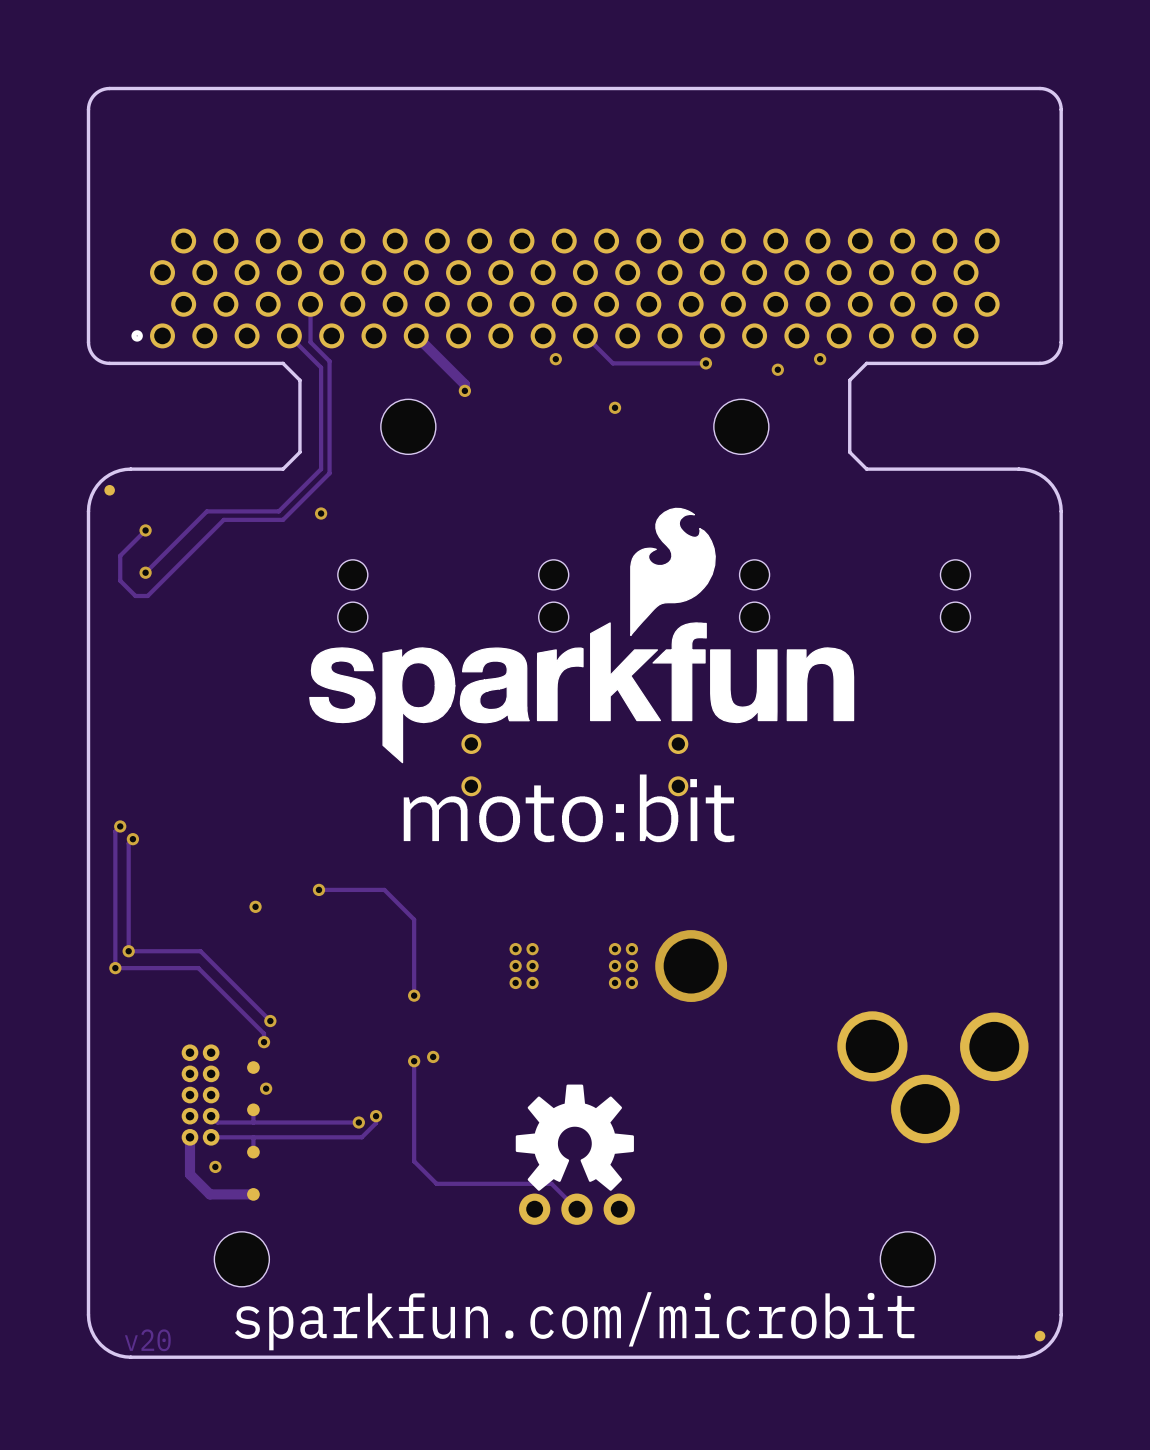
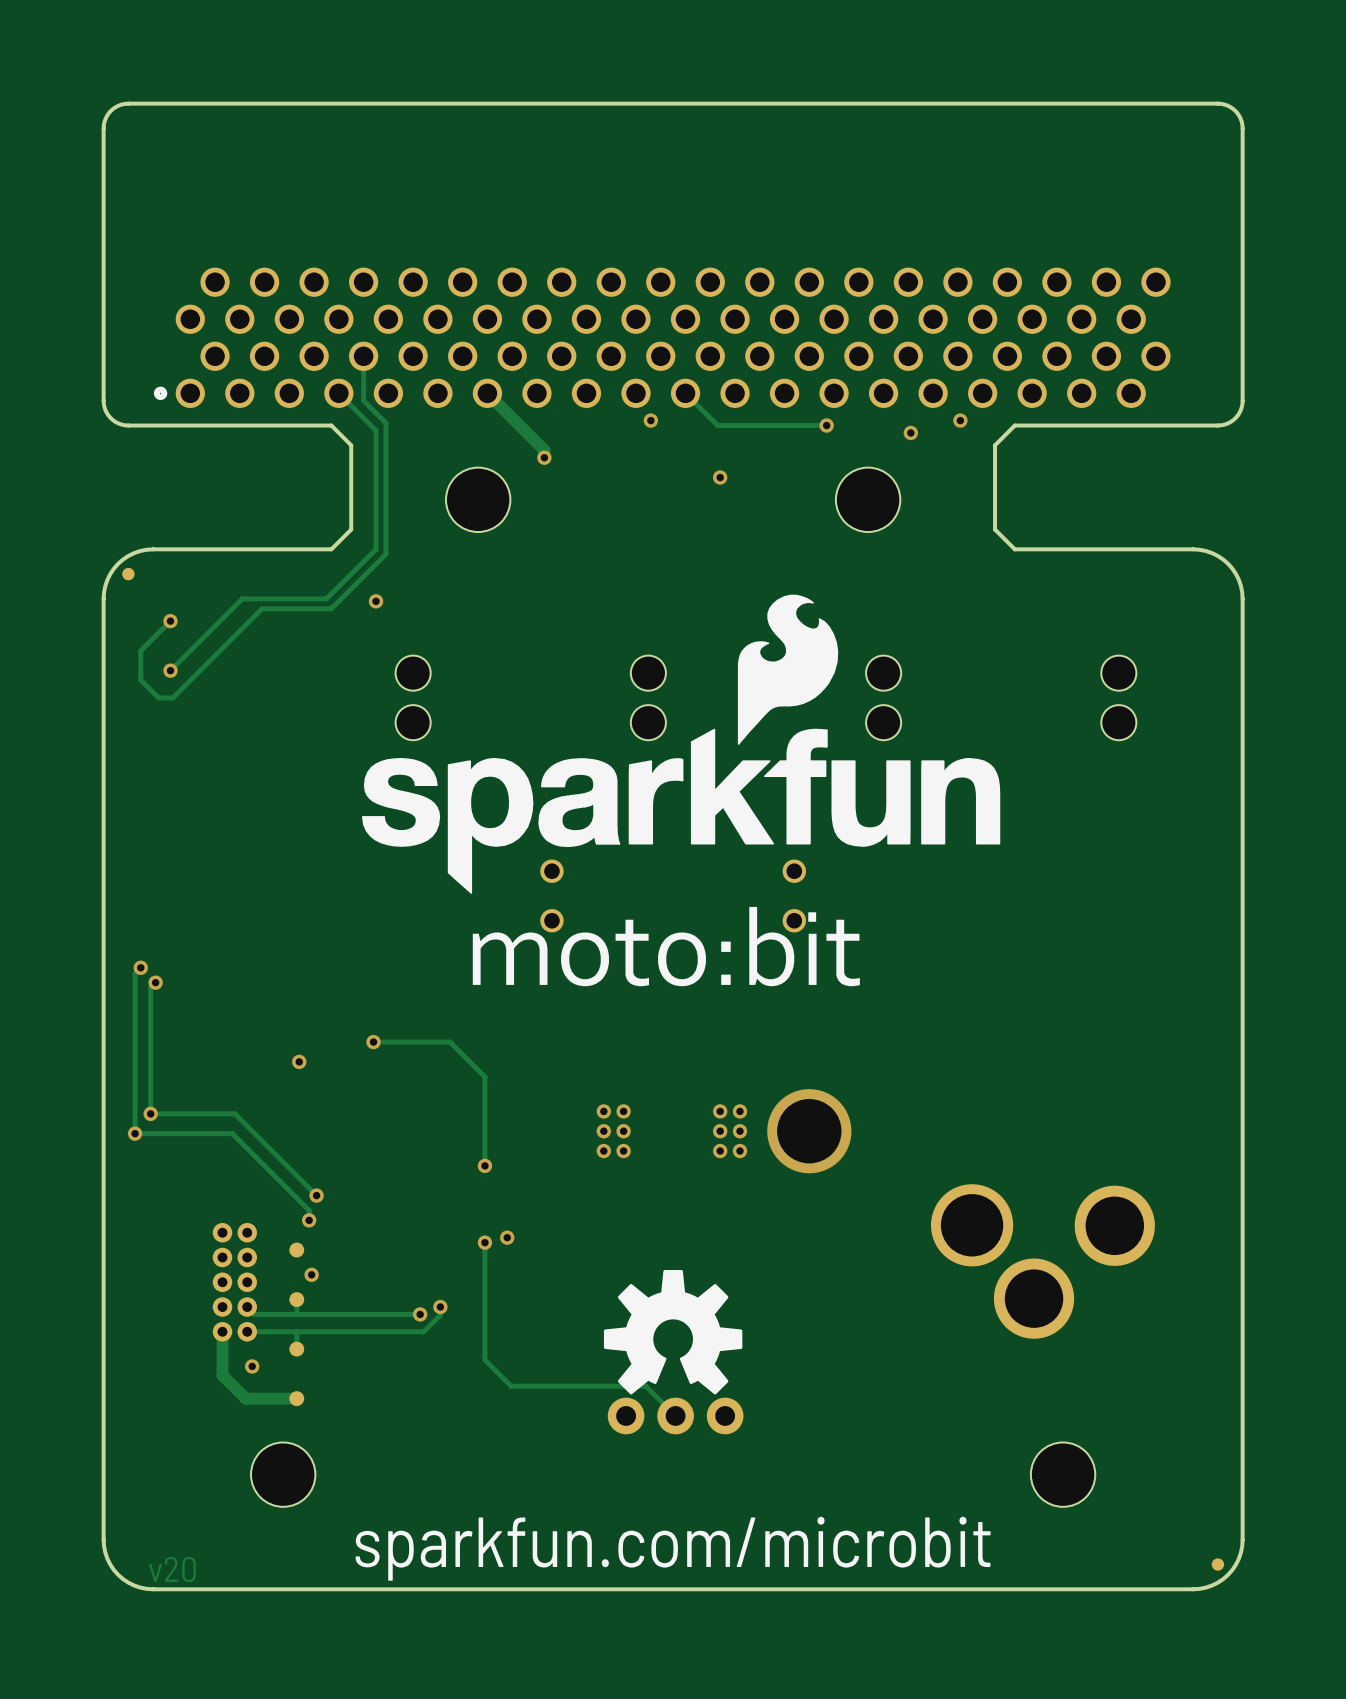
part position: (932, 1077) -> (1042, 1261)

